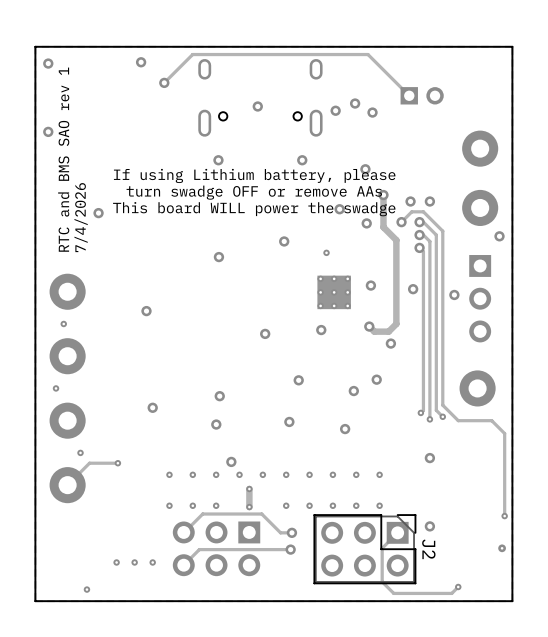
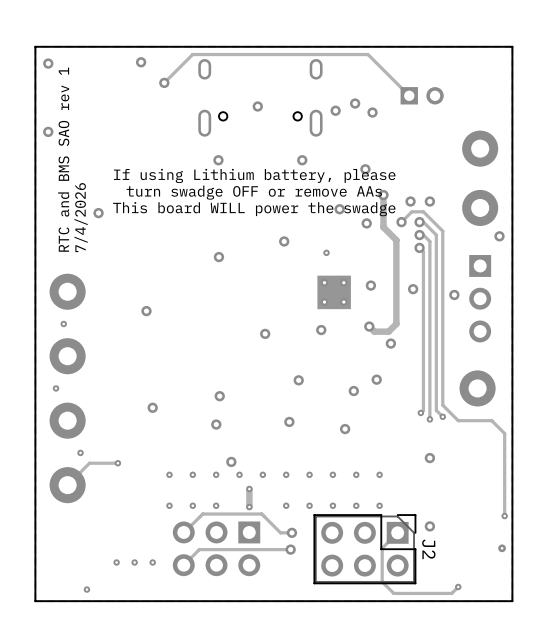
part footprint: [317, 275, 351, 310] -> [317, 275, 351, 310]

